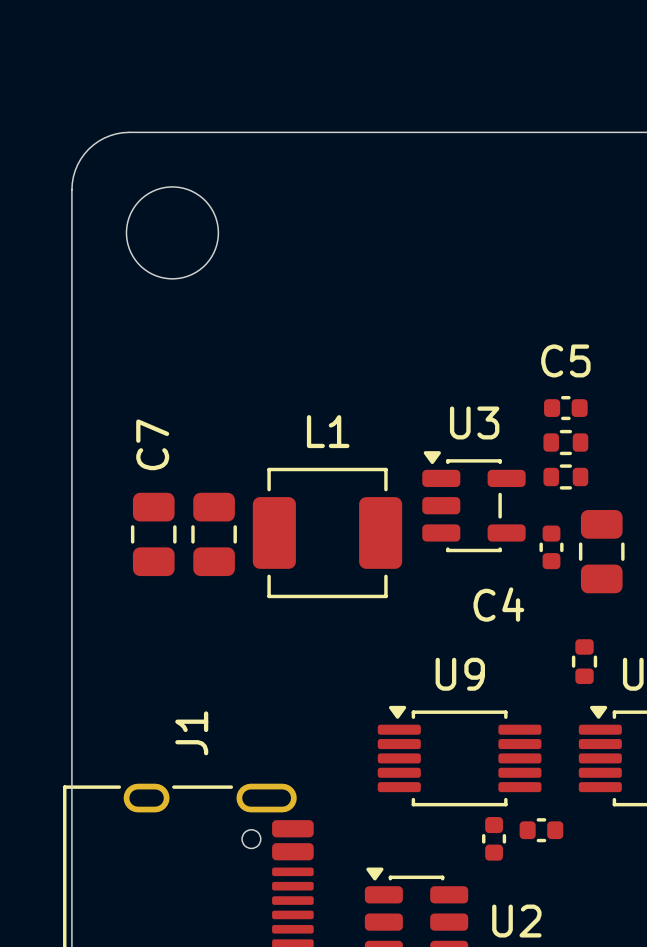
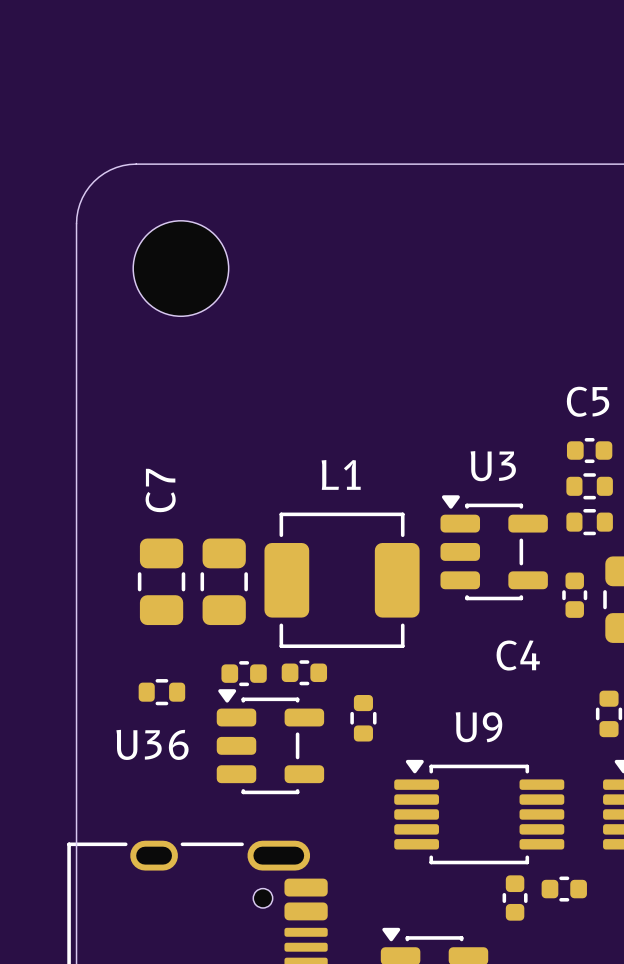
part: none -> (244, 673)
part: none -> (304, 672)
part: none -> (161, 692)
part: none -> (363, 718)
U36: none -> (270, 741)
J1 name: J1 (191, 733) -> none

